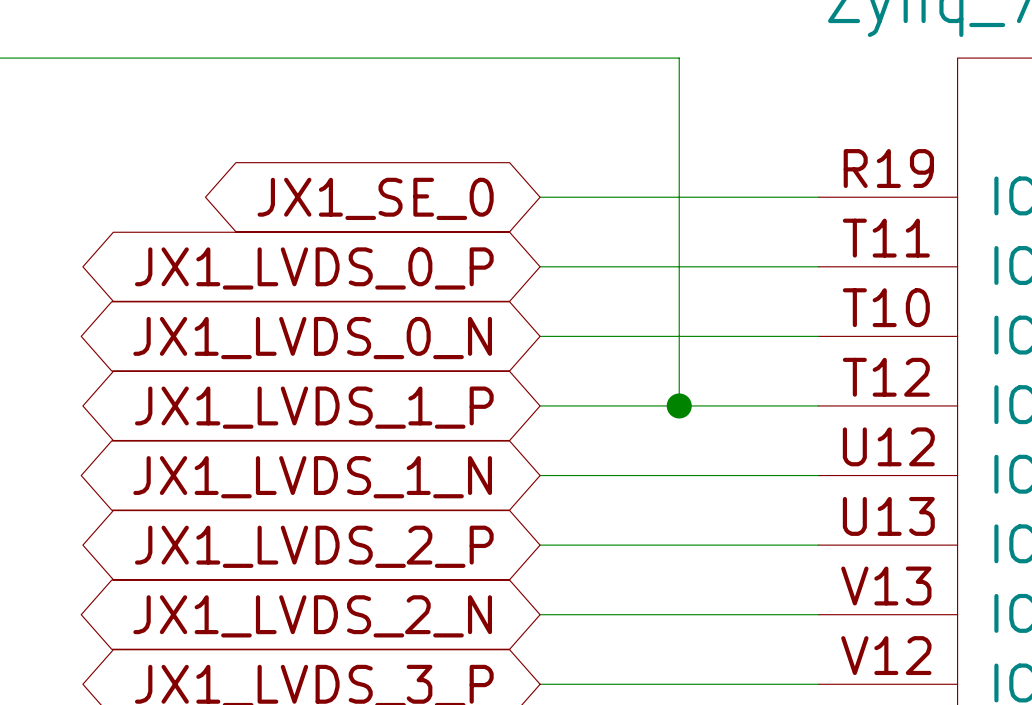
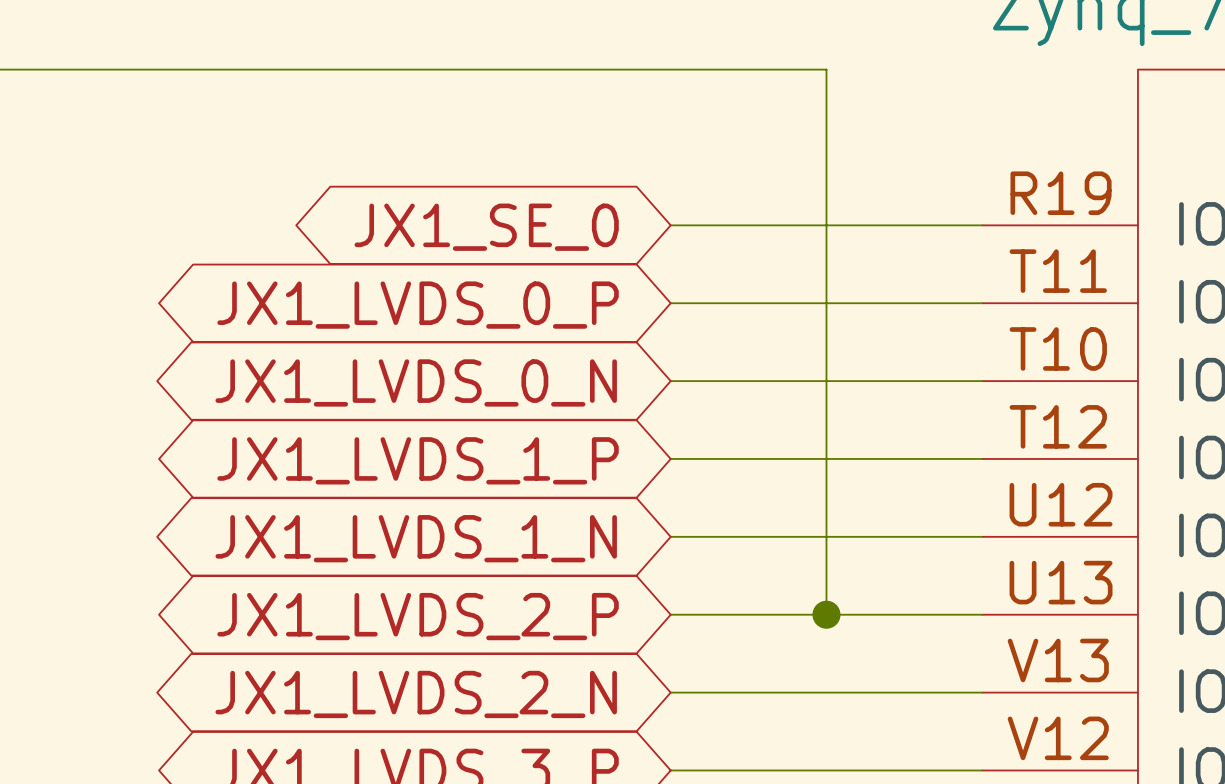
wire: none -> (826, 458) (826, 614)
junction position: (679, 405) -> (826, 614)

